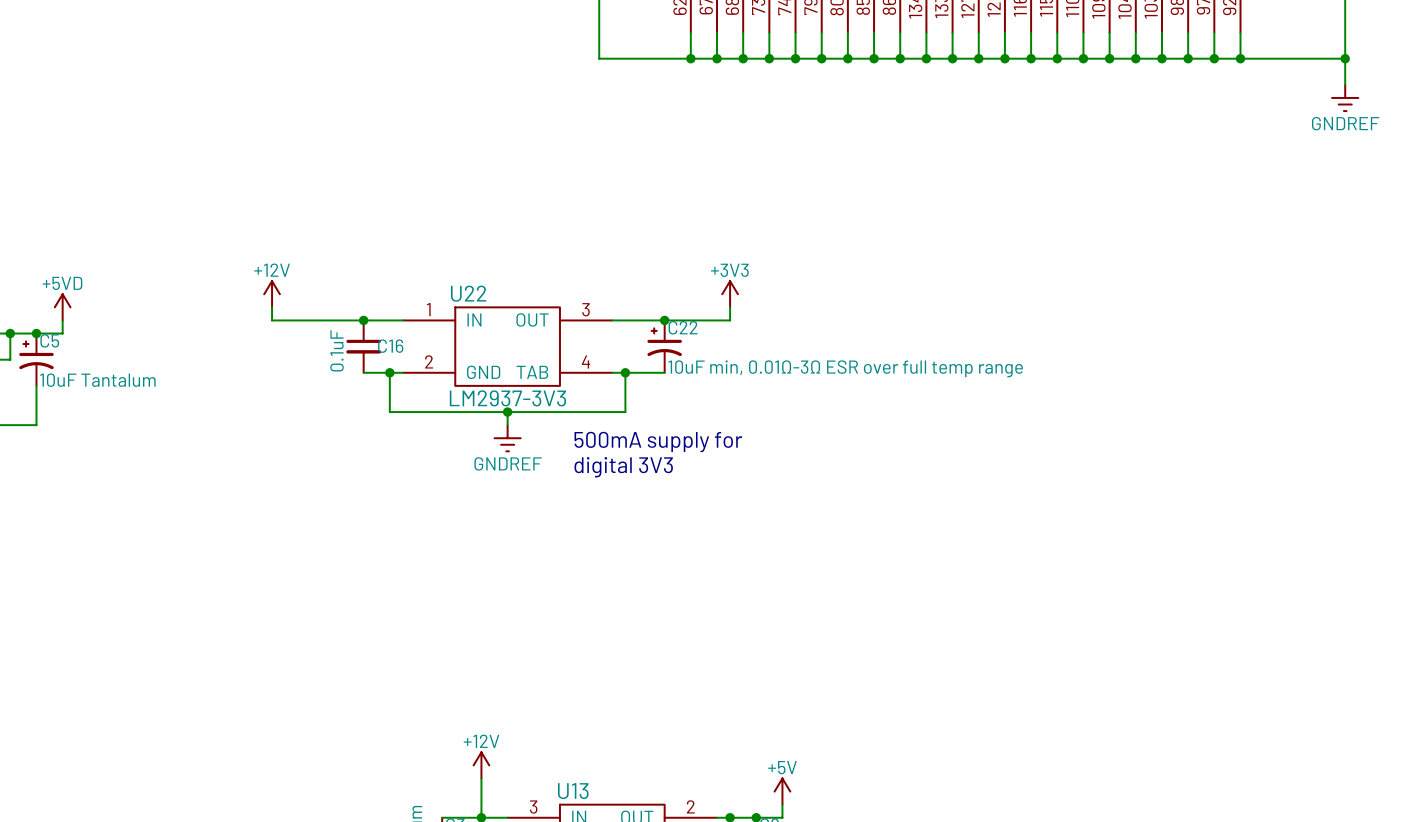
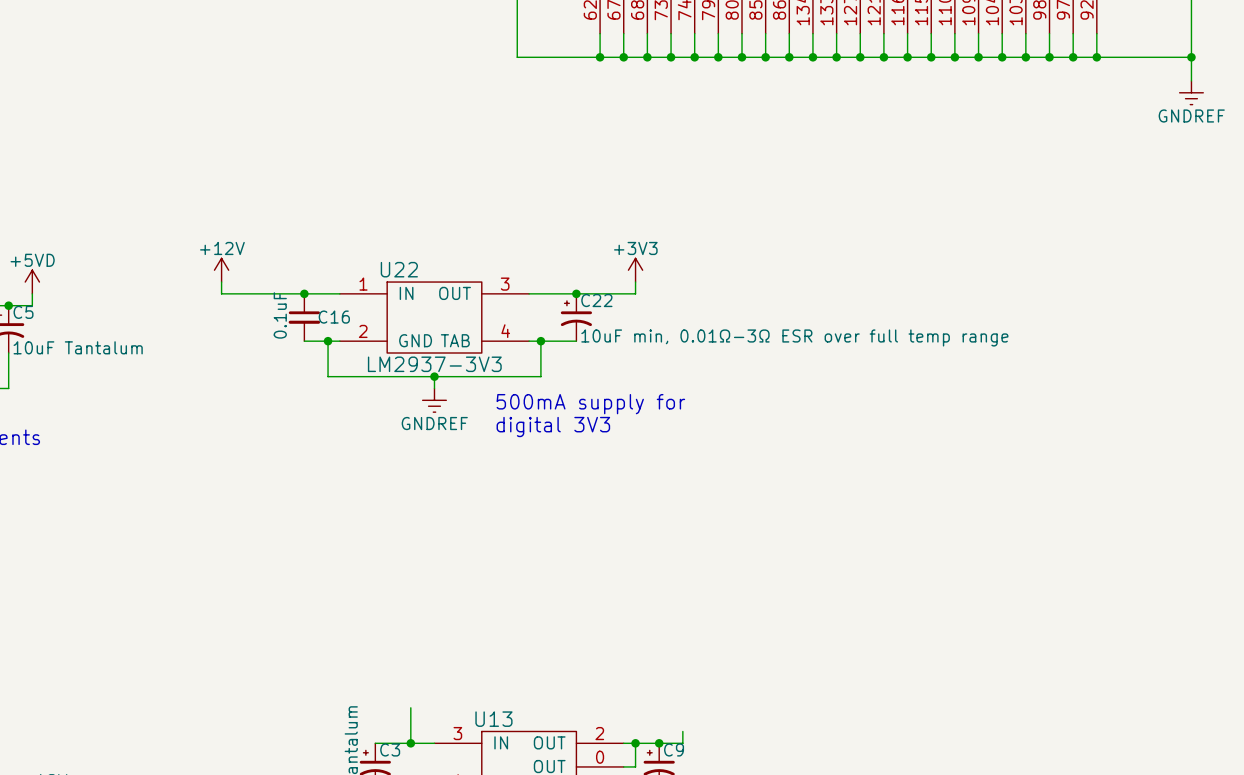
power symbol: +12V (481, 765) -> none
power symbol: +5V (782, 791) -> none

